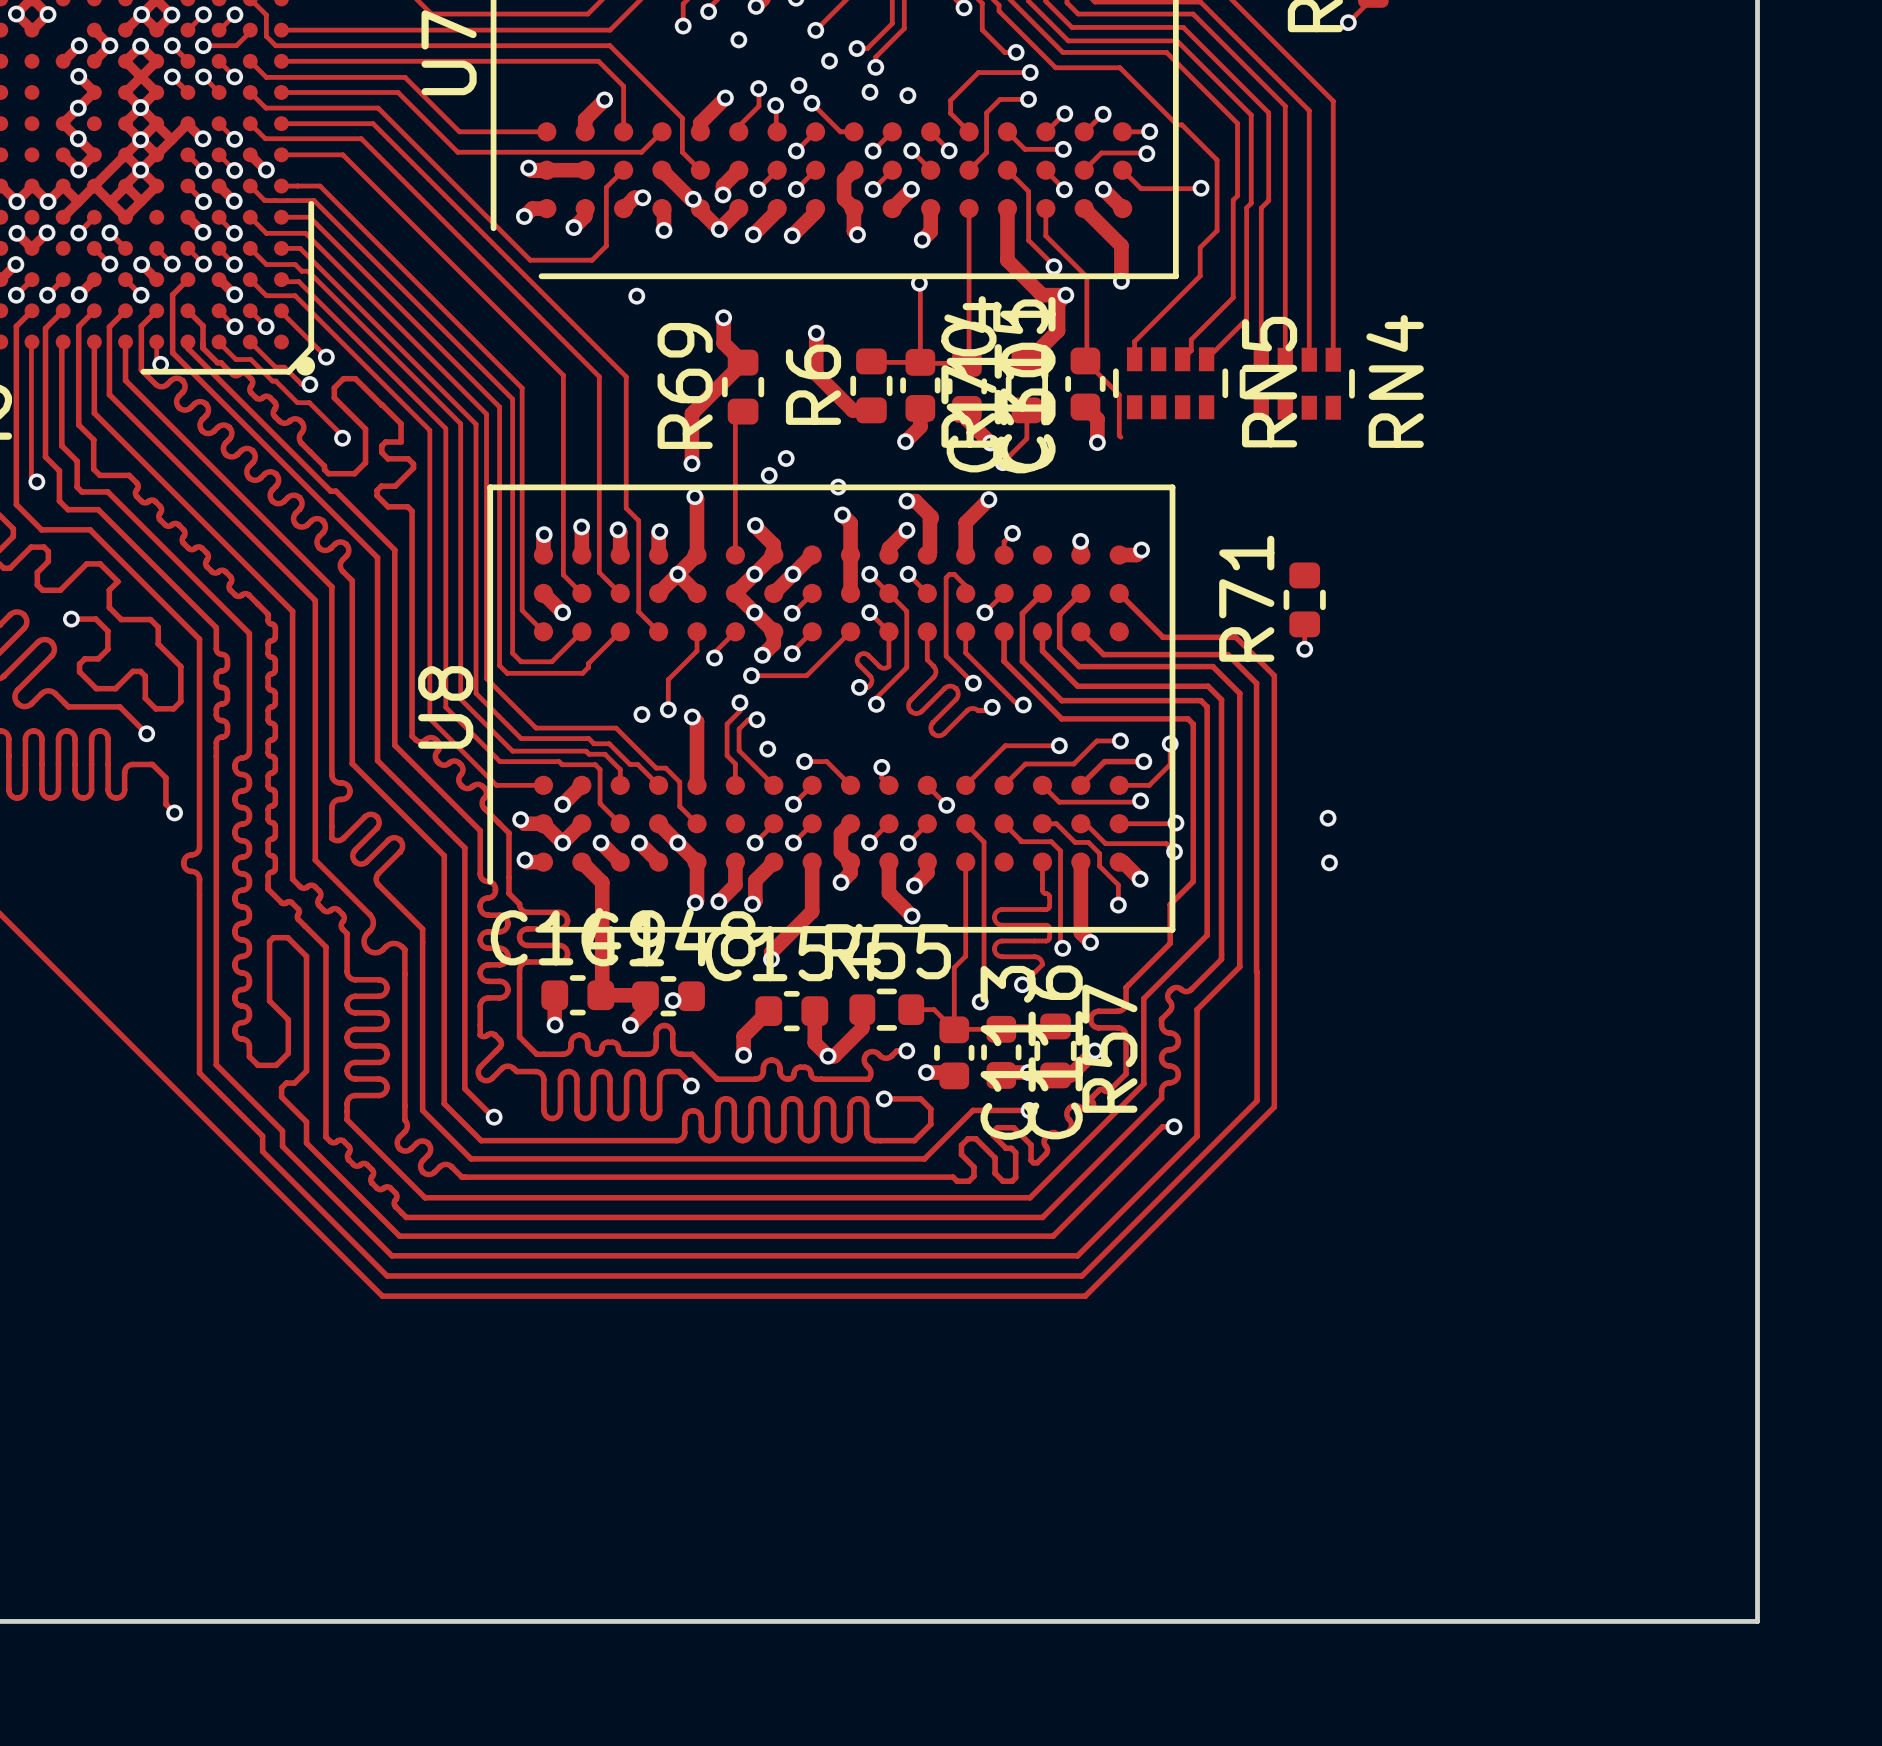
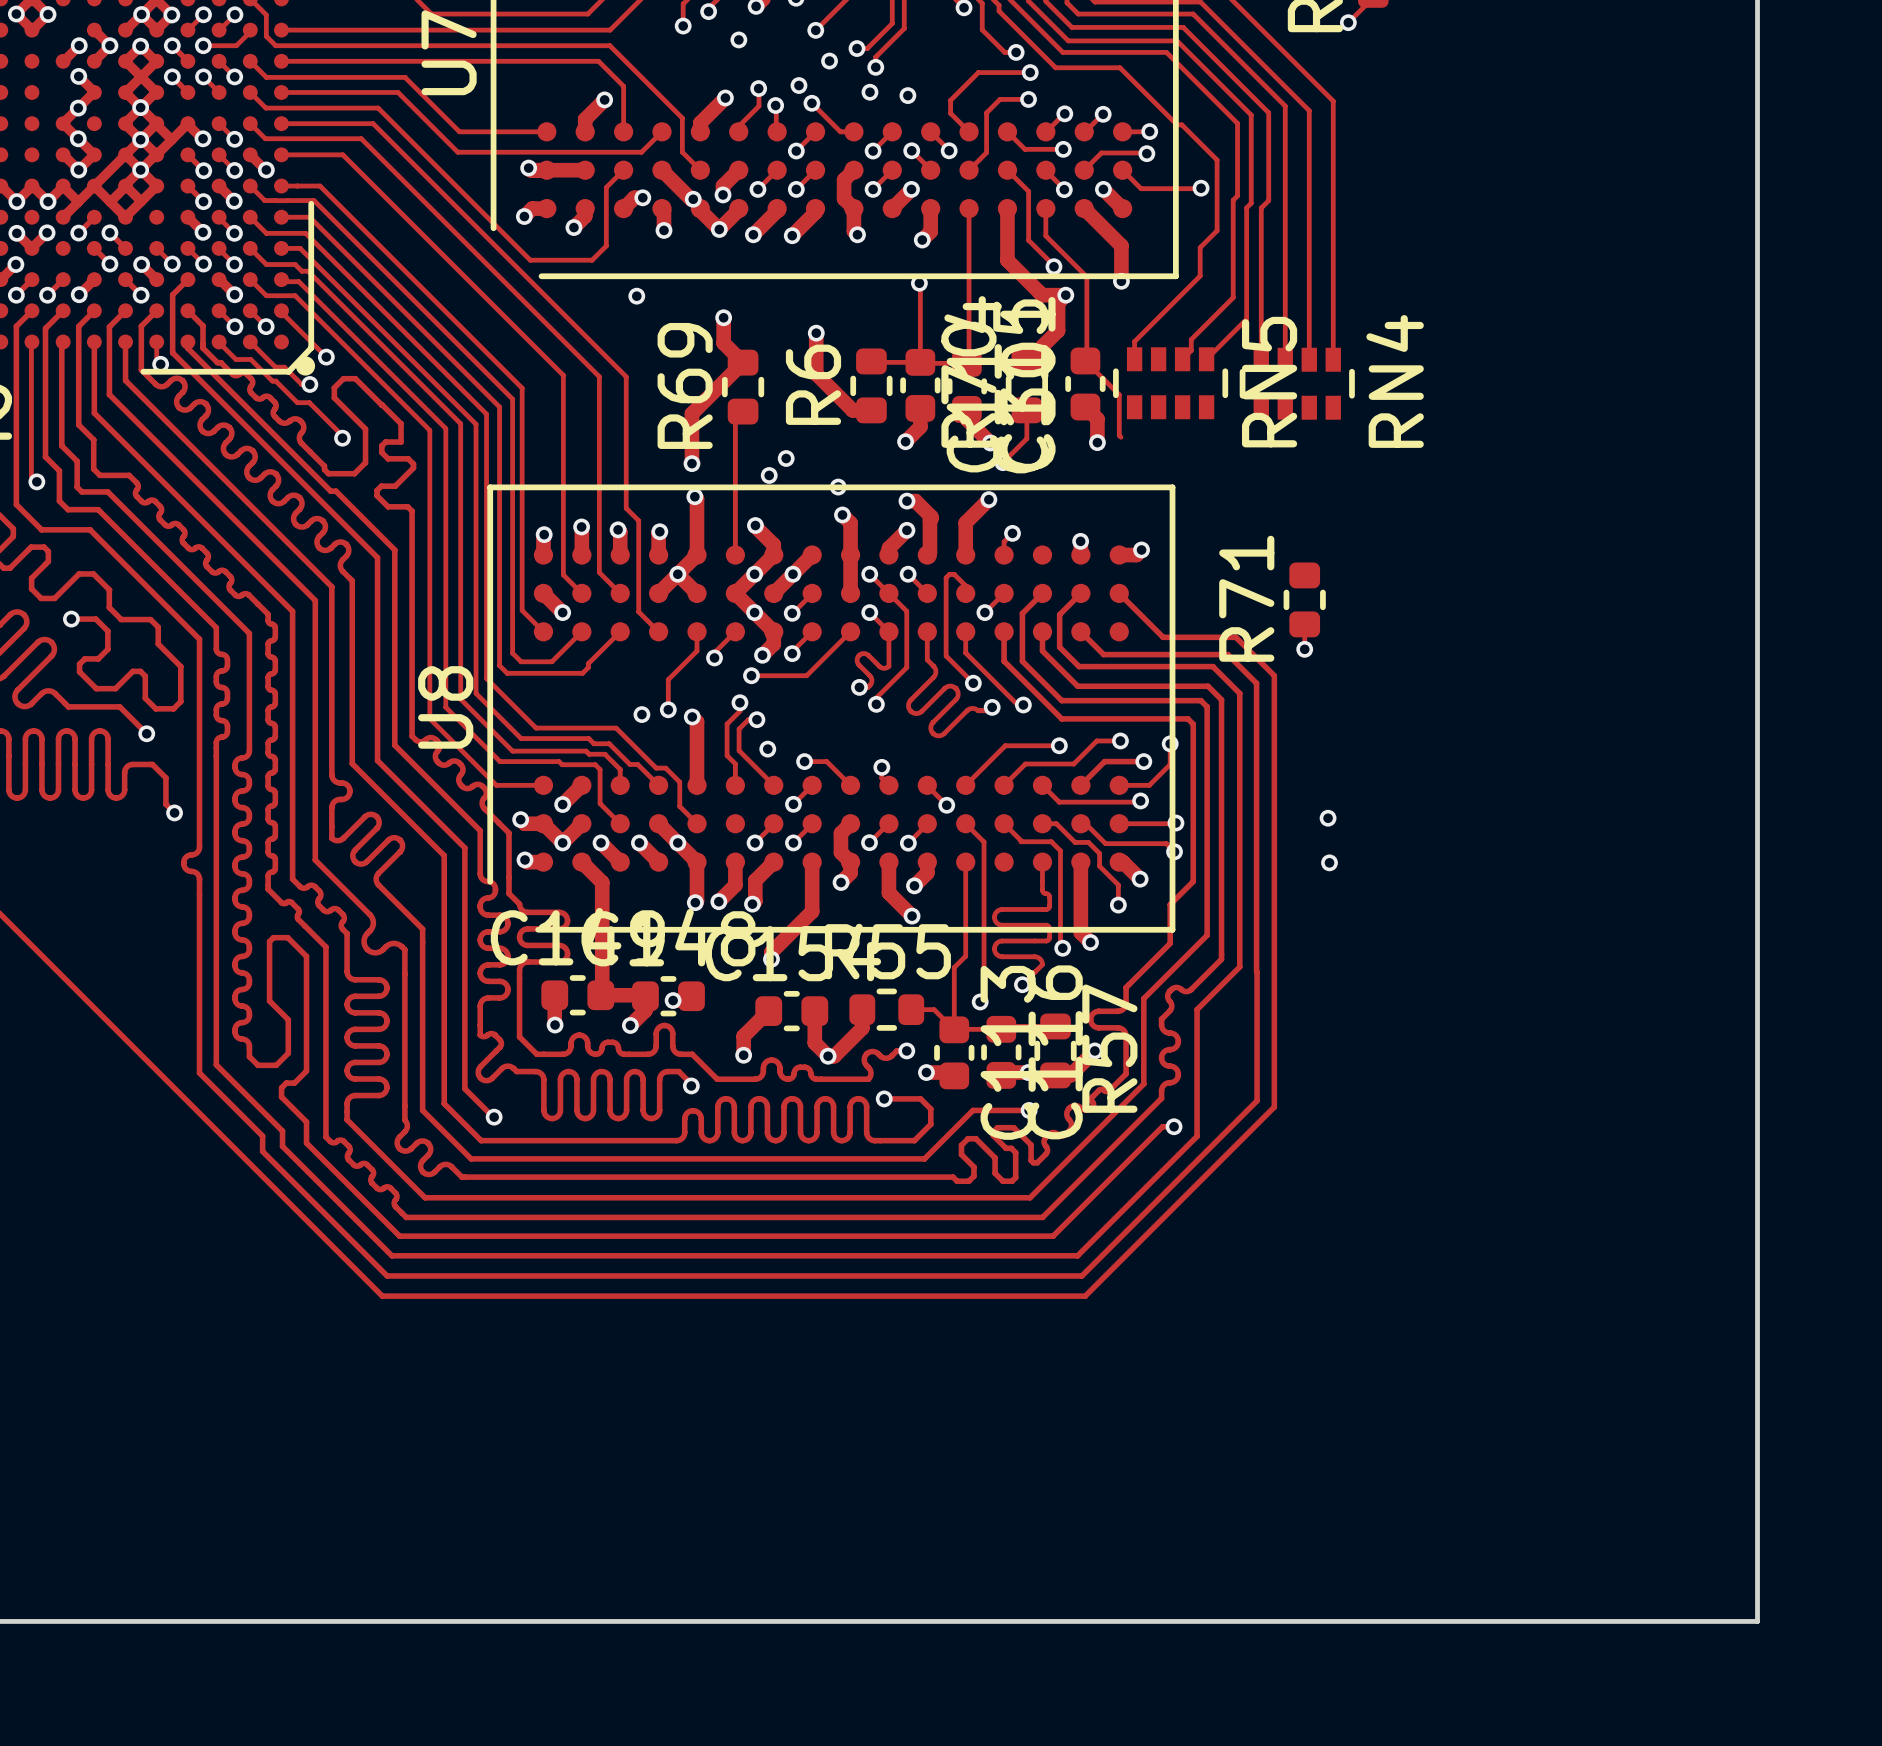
track: (37, 572) (37, 585) (42, 590) (60, 590) (86, 563) (100, 563) (117, 581) (109, 590) -> (37, 572) (31, 578) (31, 588) (41, 598) (54, 598) (79, 573) (93, 573) (109, 590)

